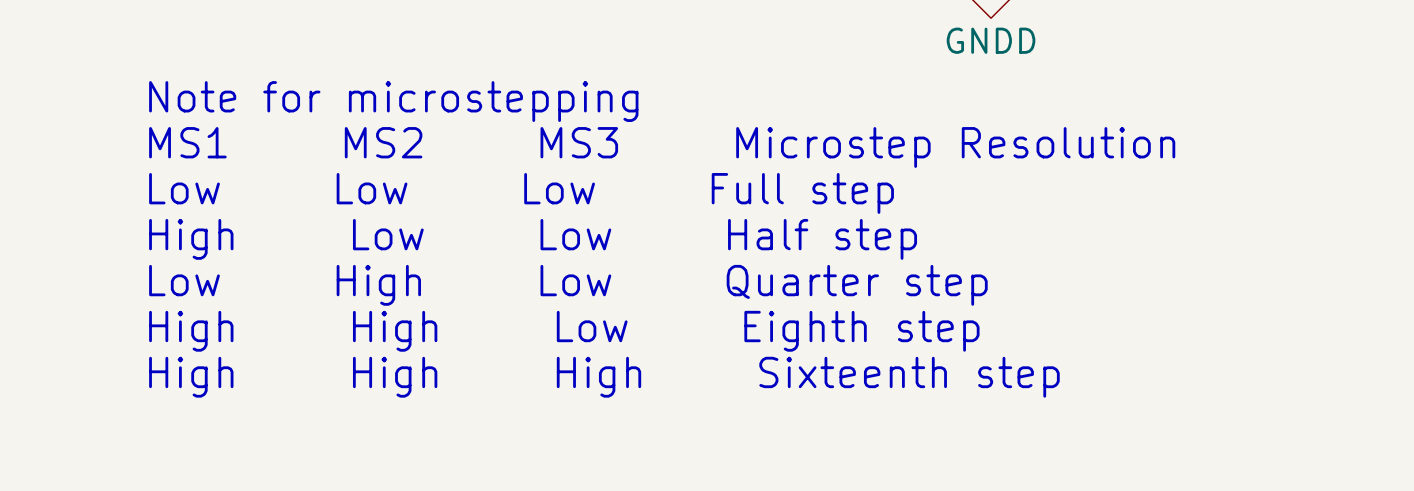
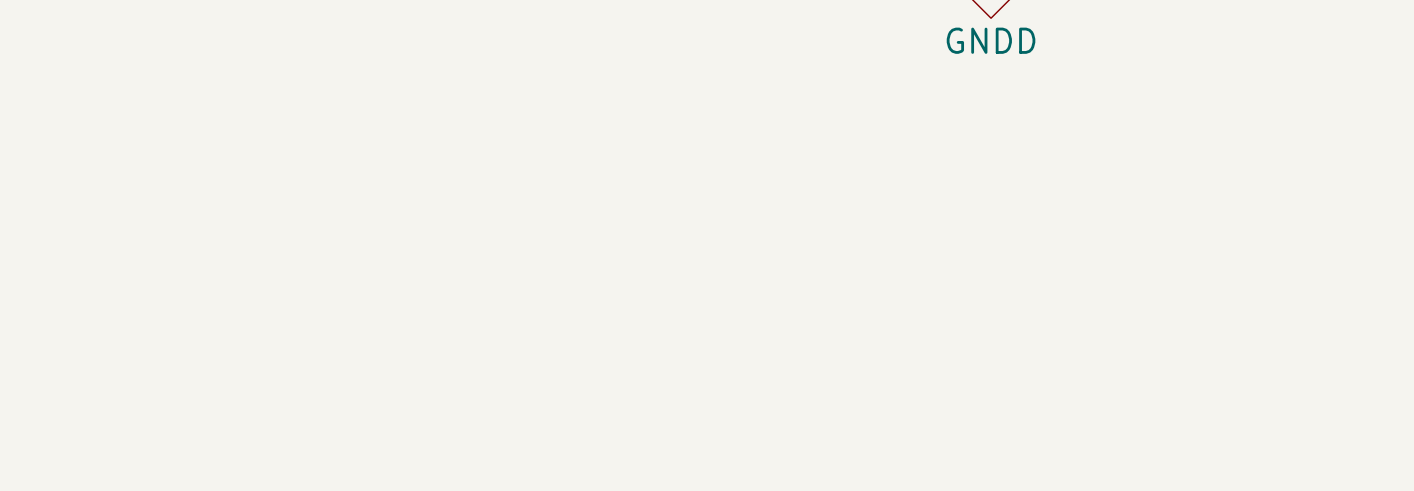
text: Note for microstepping (393, 101) -> none
text: MS1 MS2 MS3 Microstep Resolution (662, 147) -> none
text: Low Low Low Full step (521, 193) -> none
text: High Low Low Half step (533, 239) -> none
text: Low High Low Quarter step (568, 285) -> none
text: High High Low Eighth step (564, 331) -> none
text: High High High Sixteenth step (604, 377) -> none

